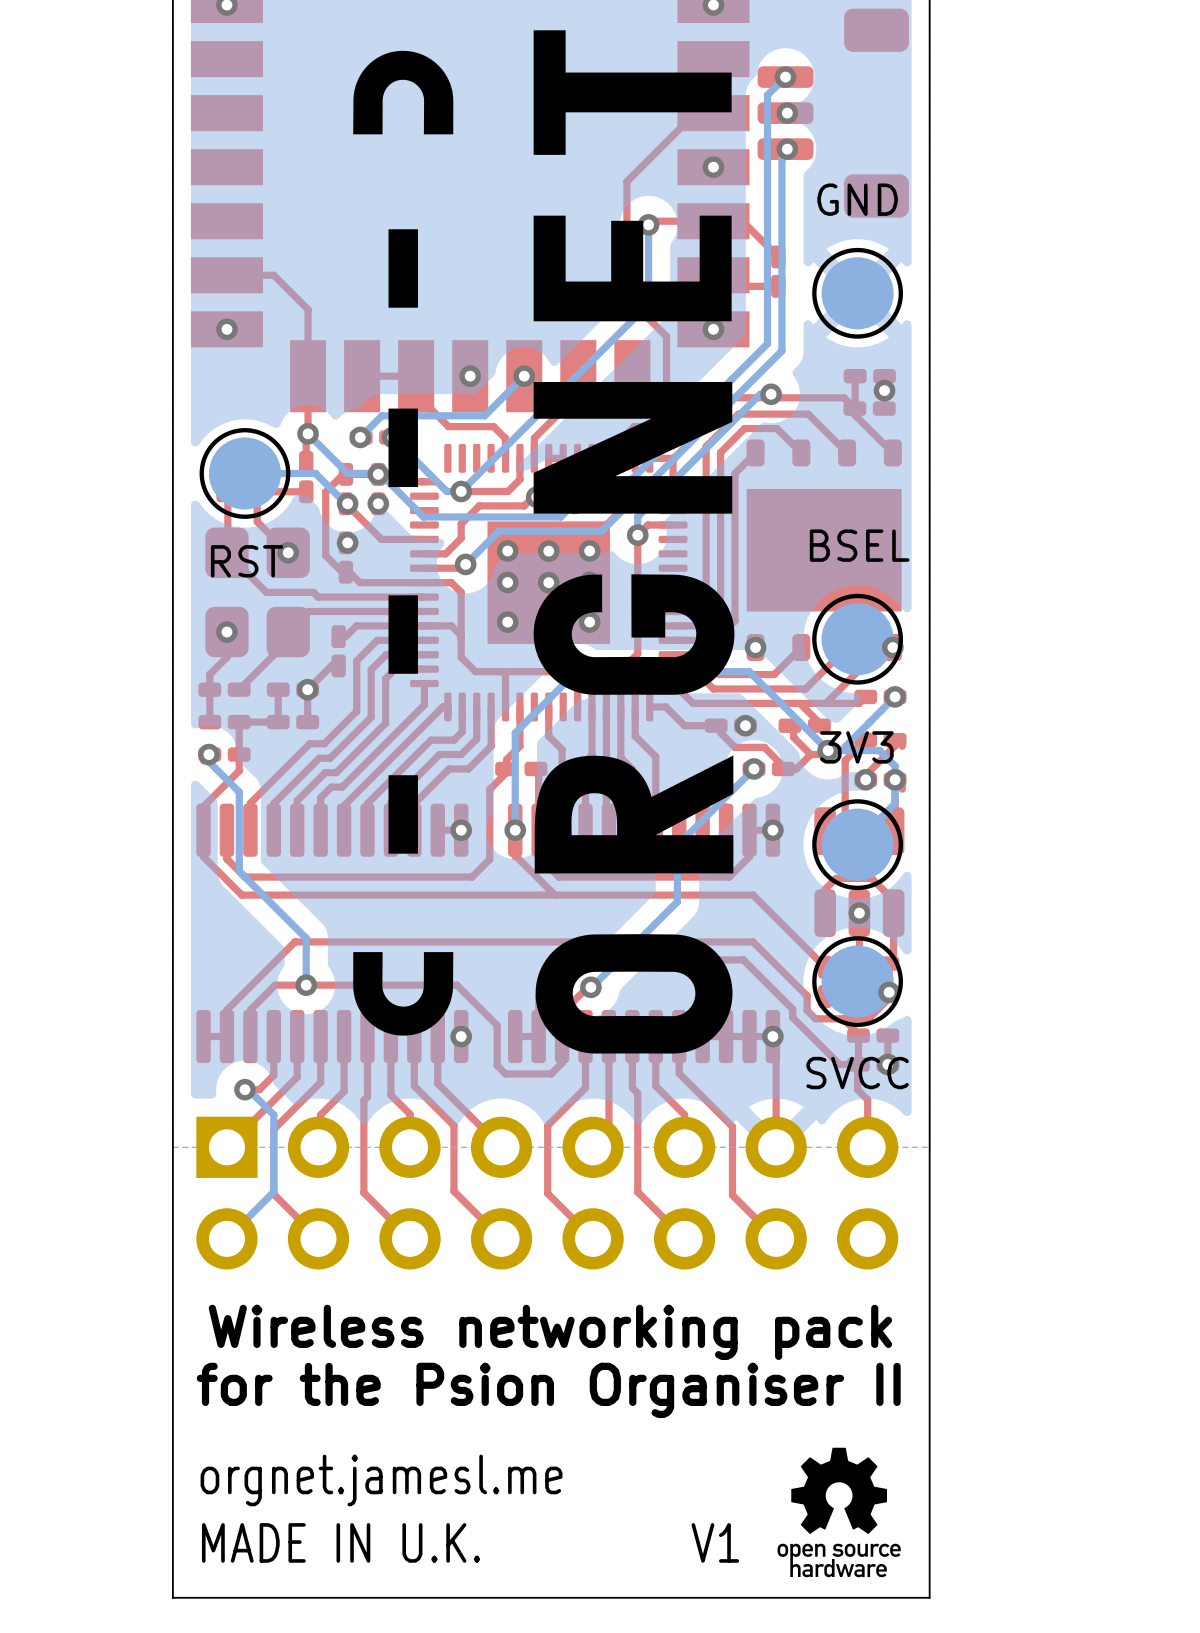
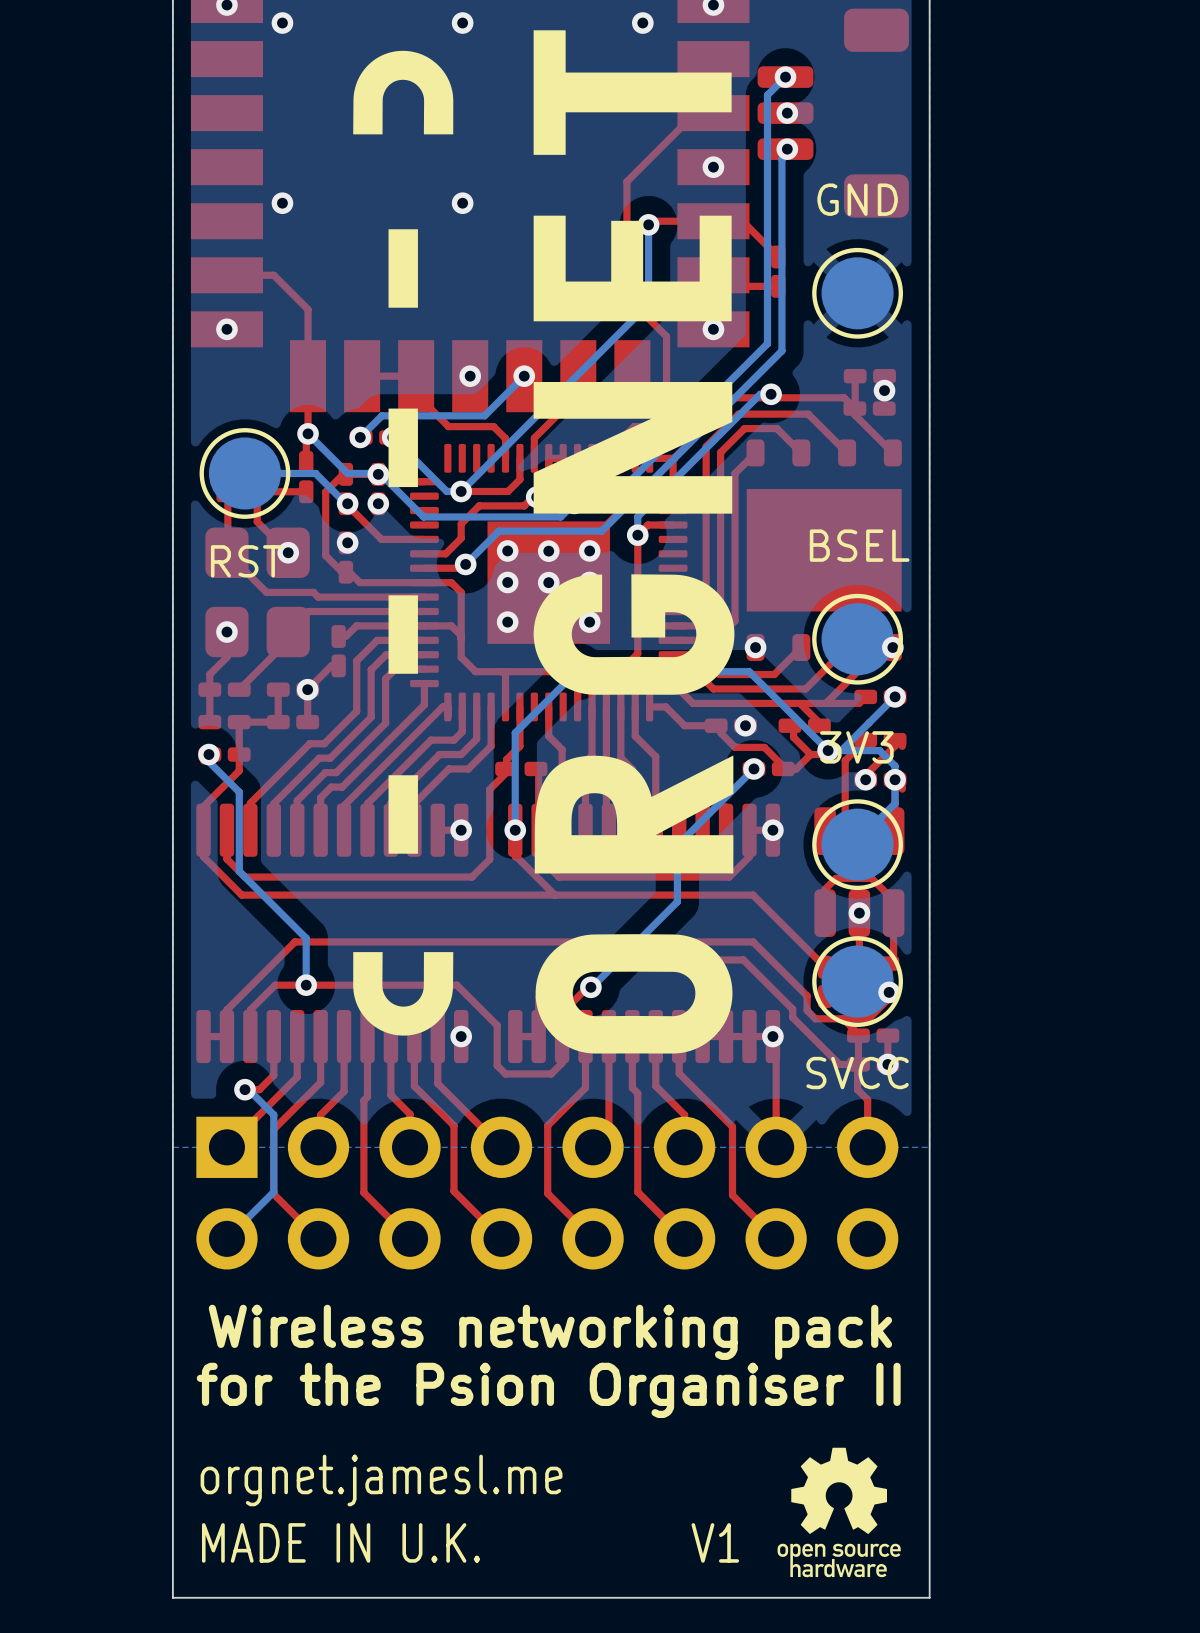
via: none -> (282, 23)
via: none -> (462, 23)
via: none -> (642, 23)
via: none -> (282, 203)
via: none -> (462, 203)

